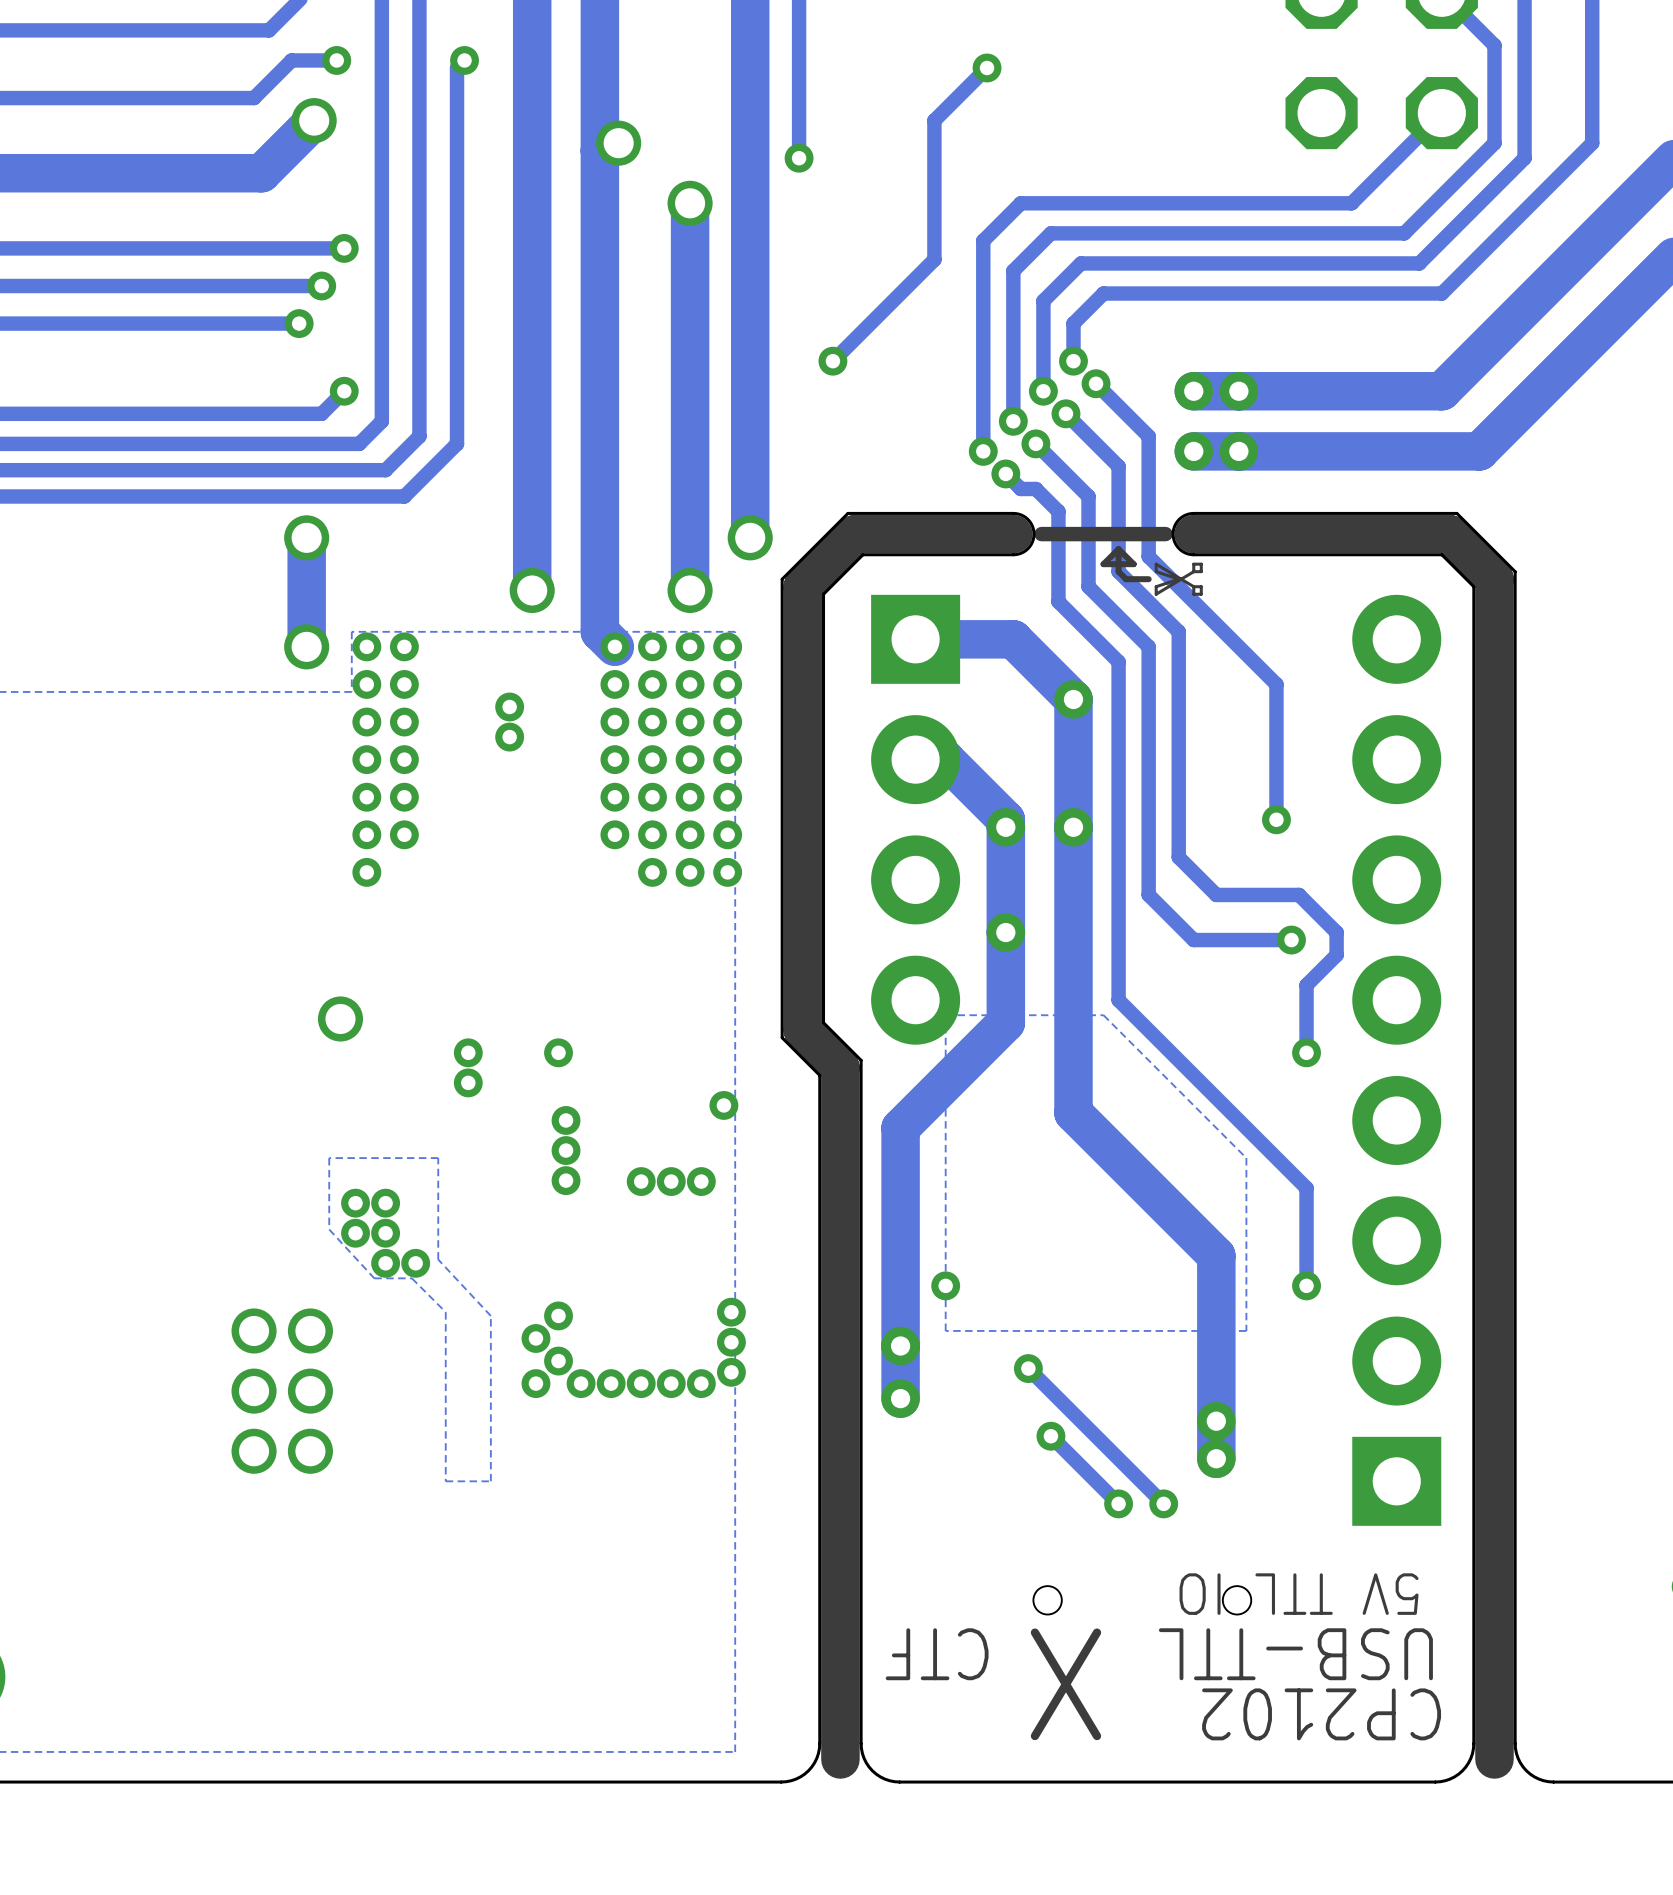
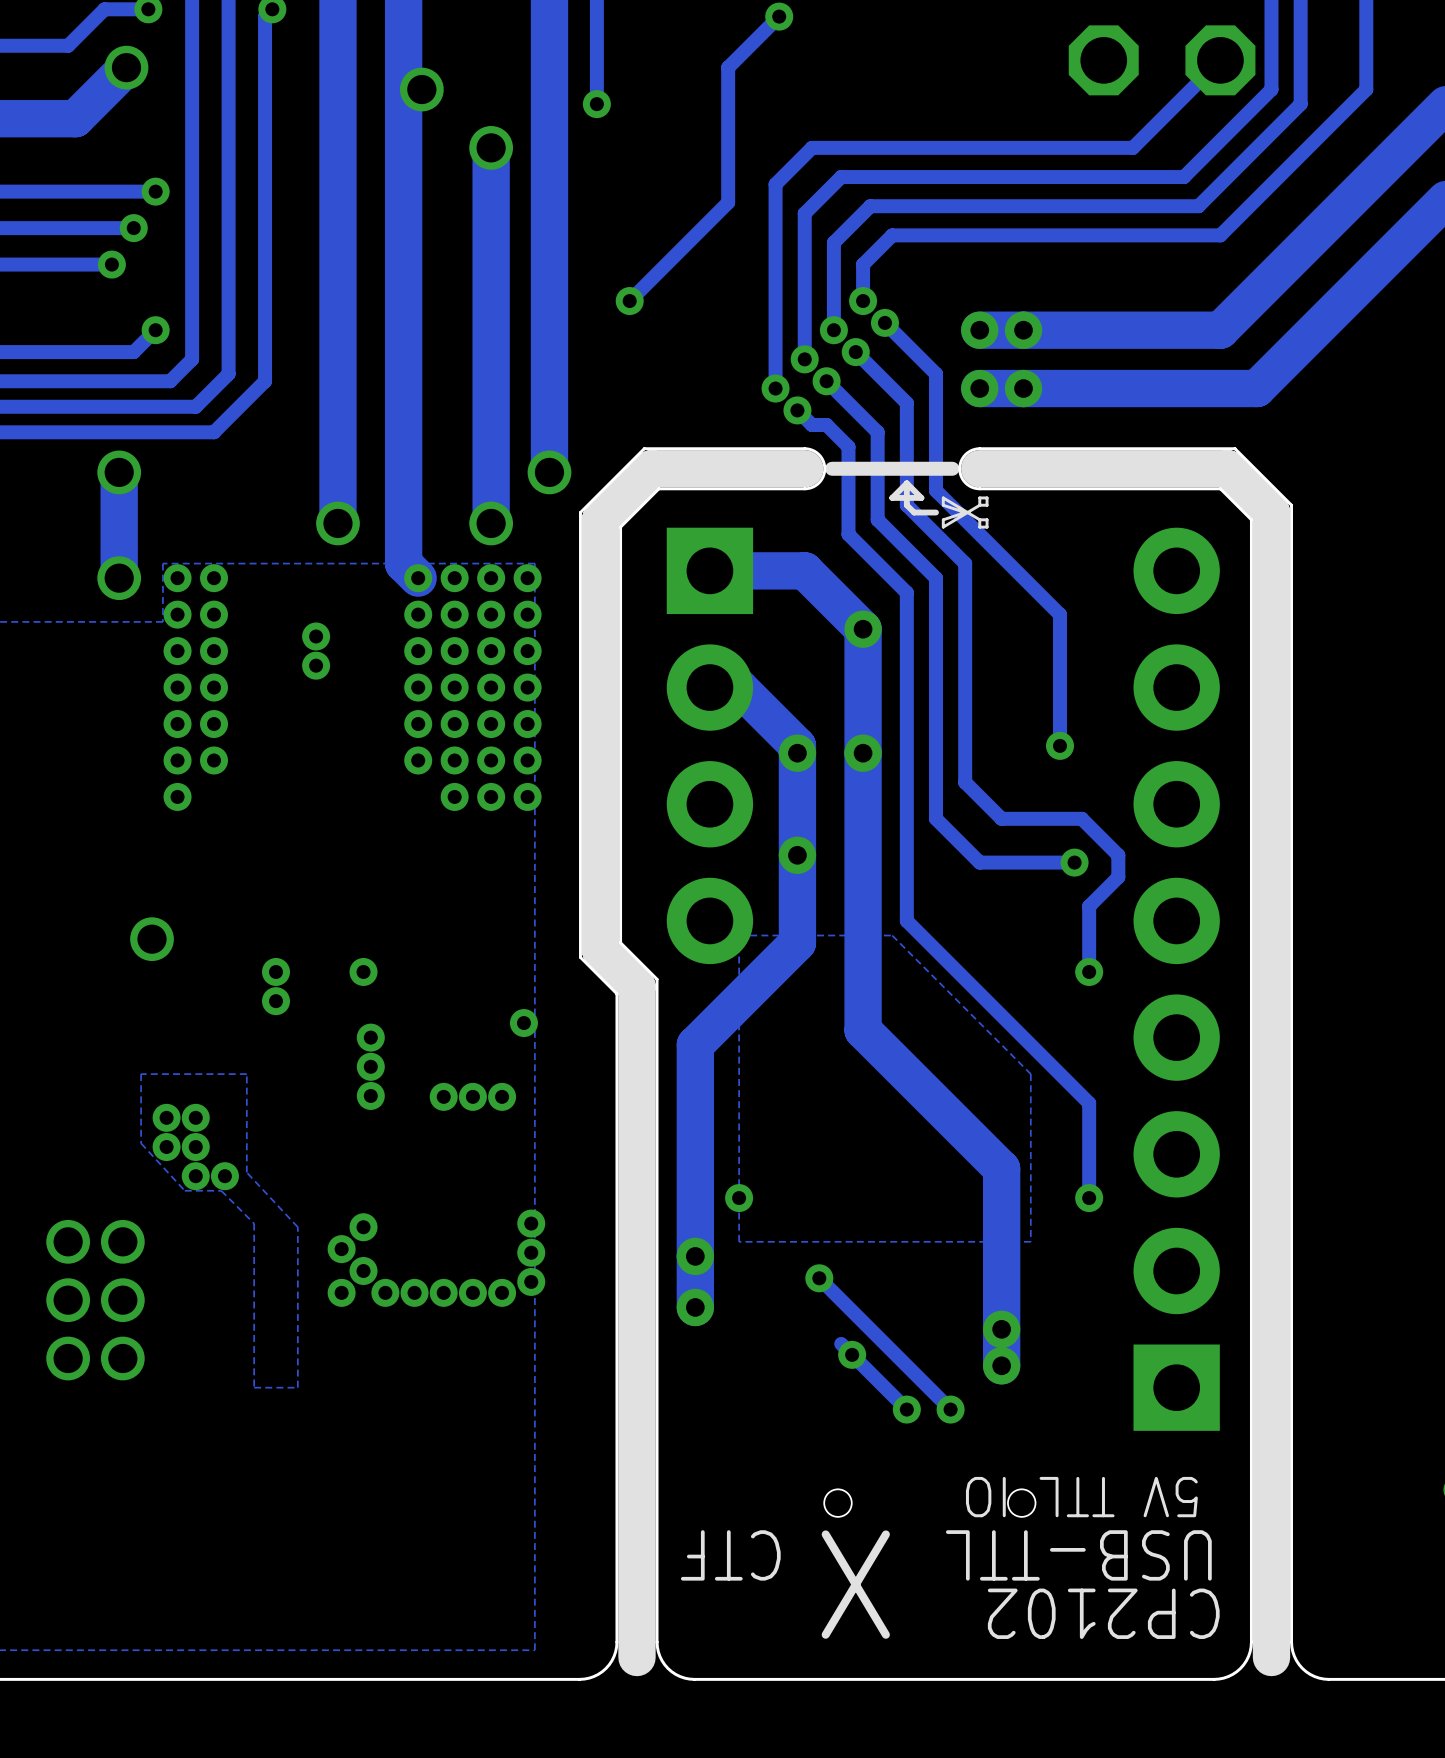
via position: (1050, 1436) -> (852, 1354)

